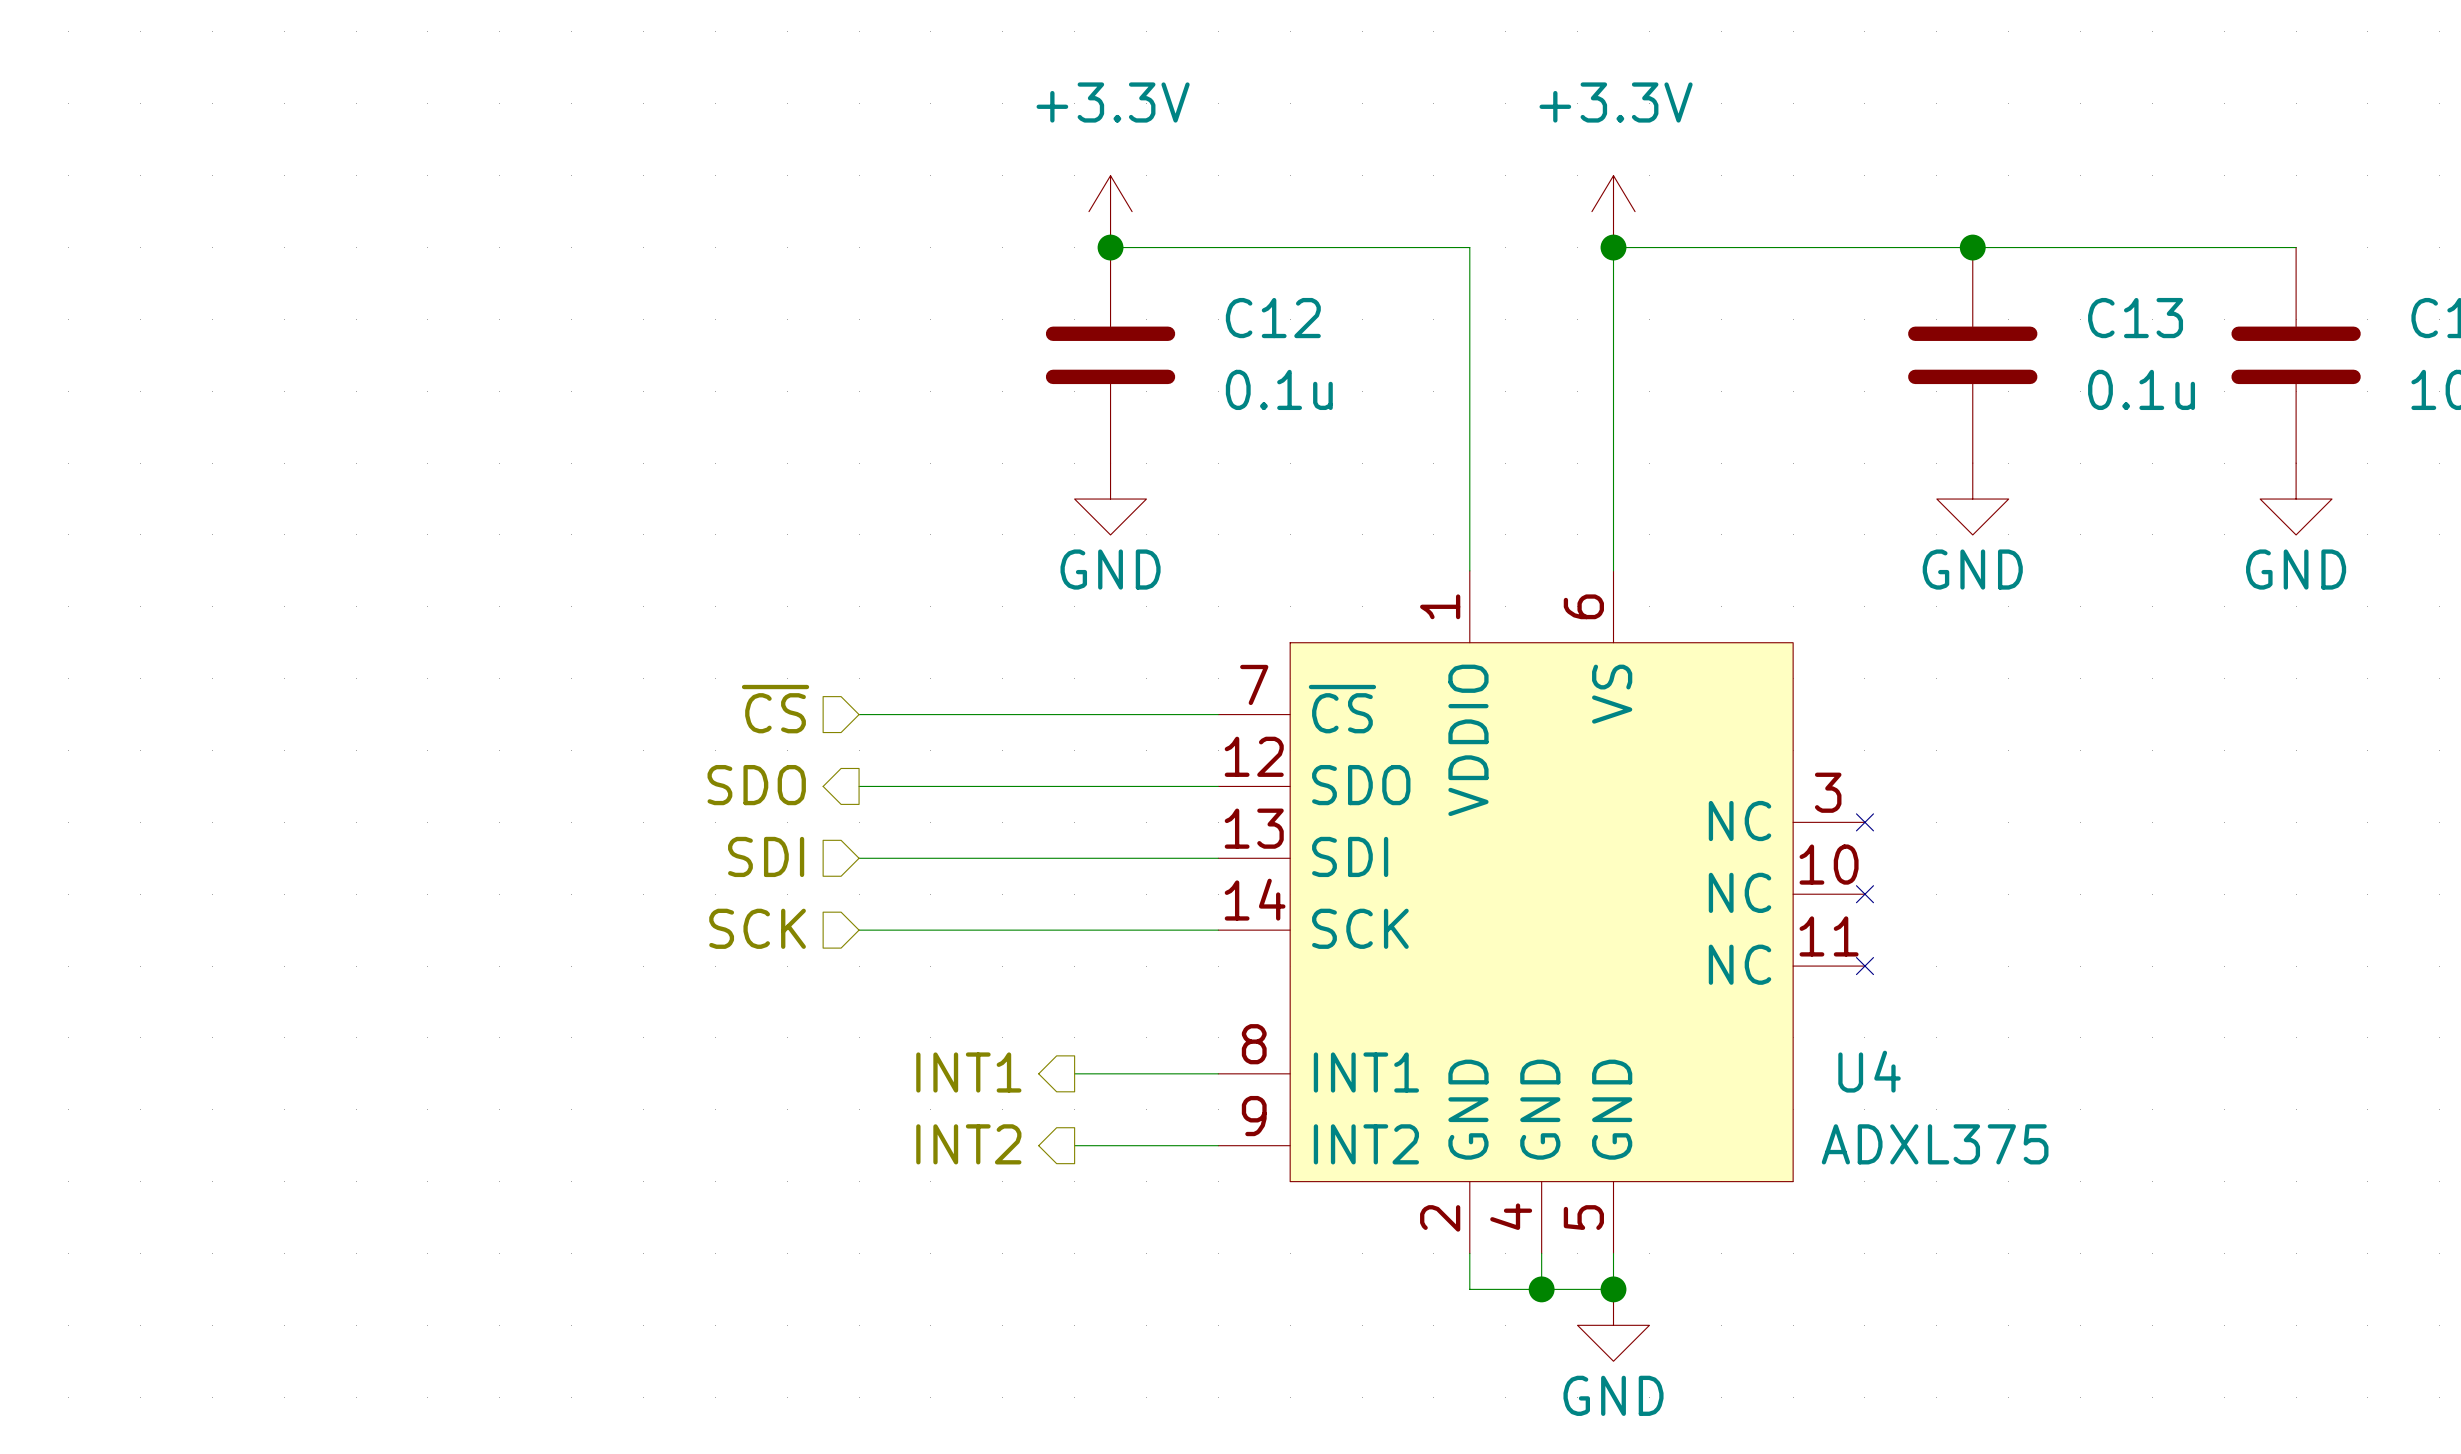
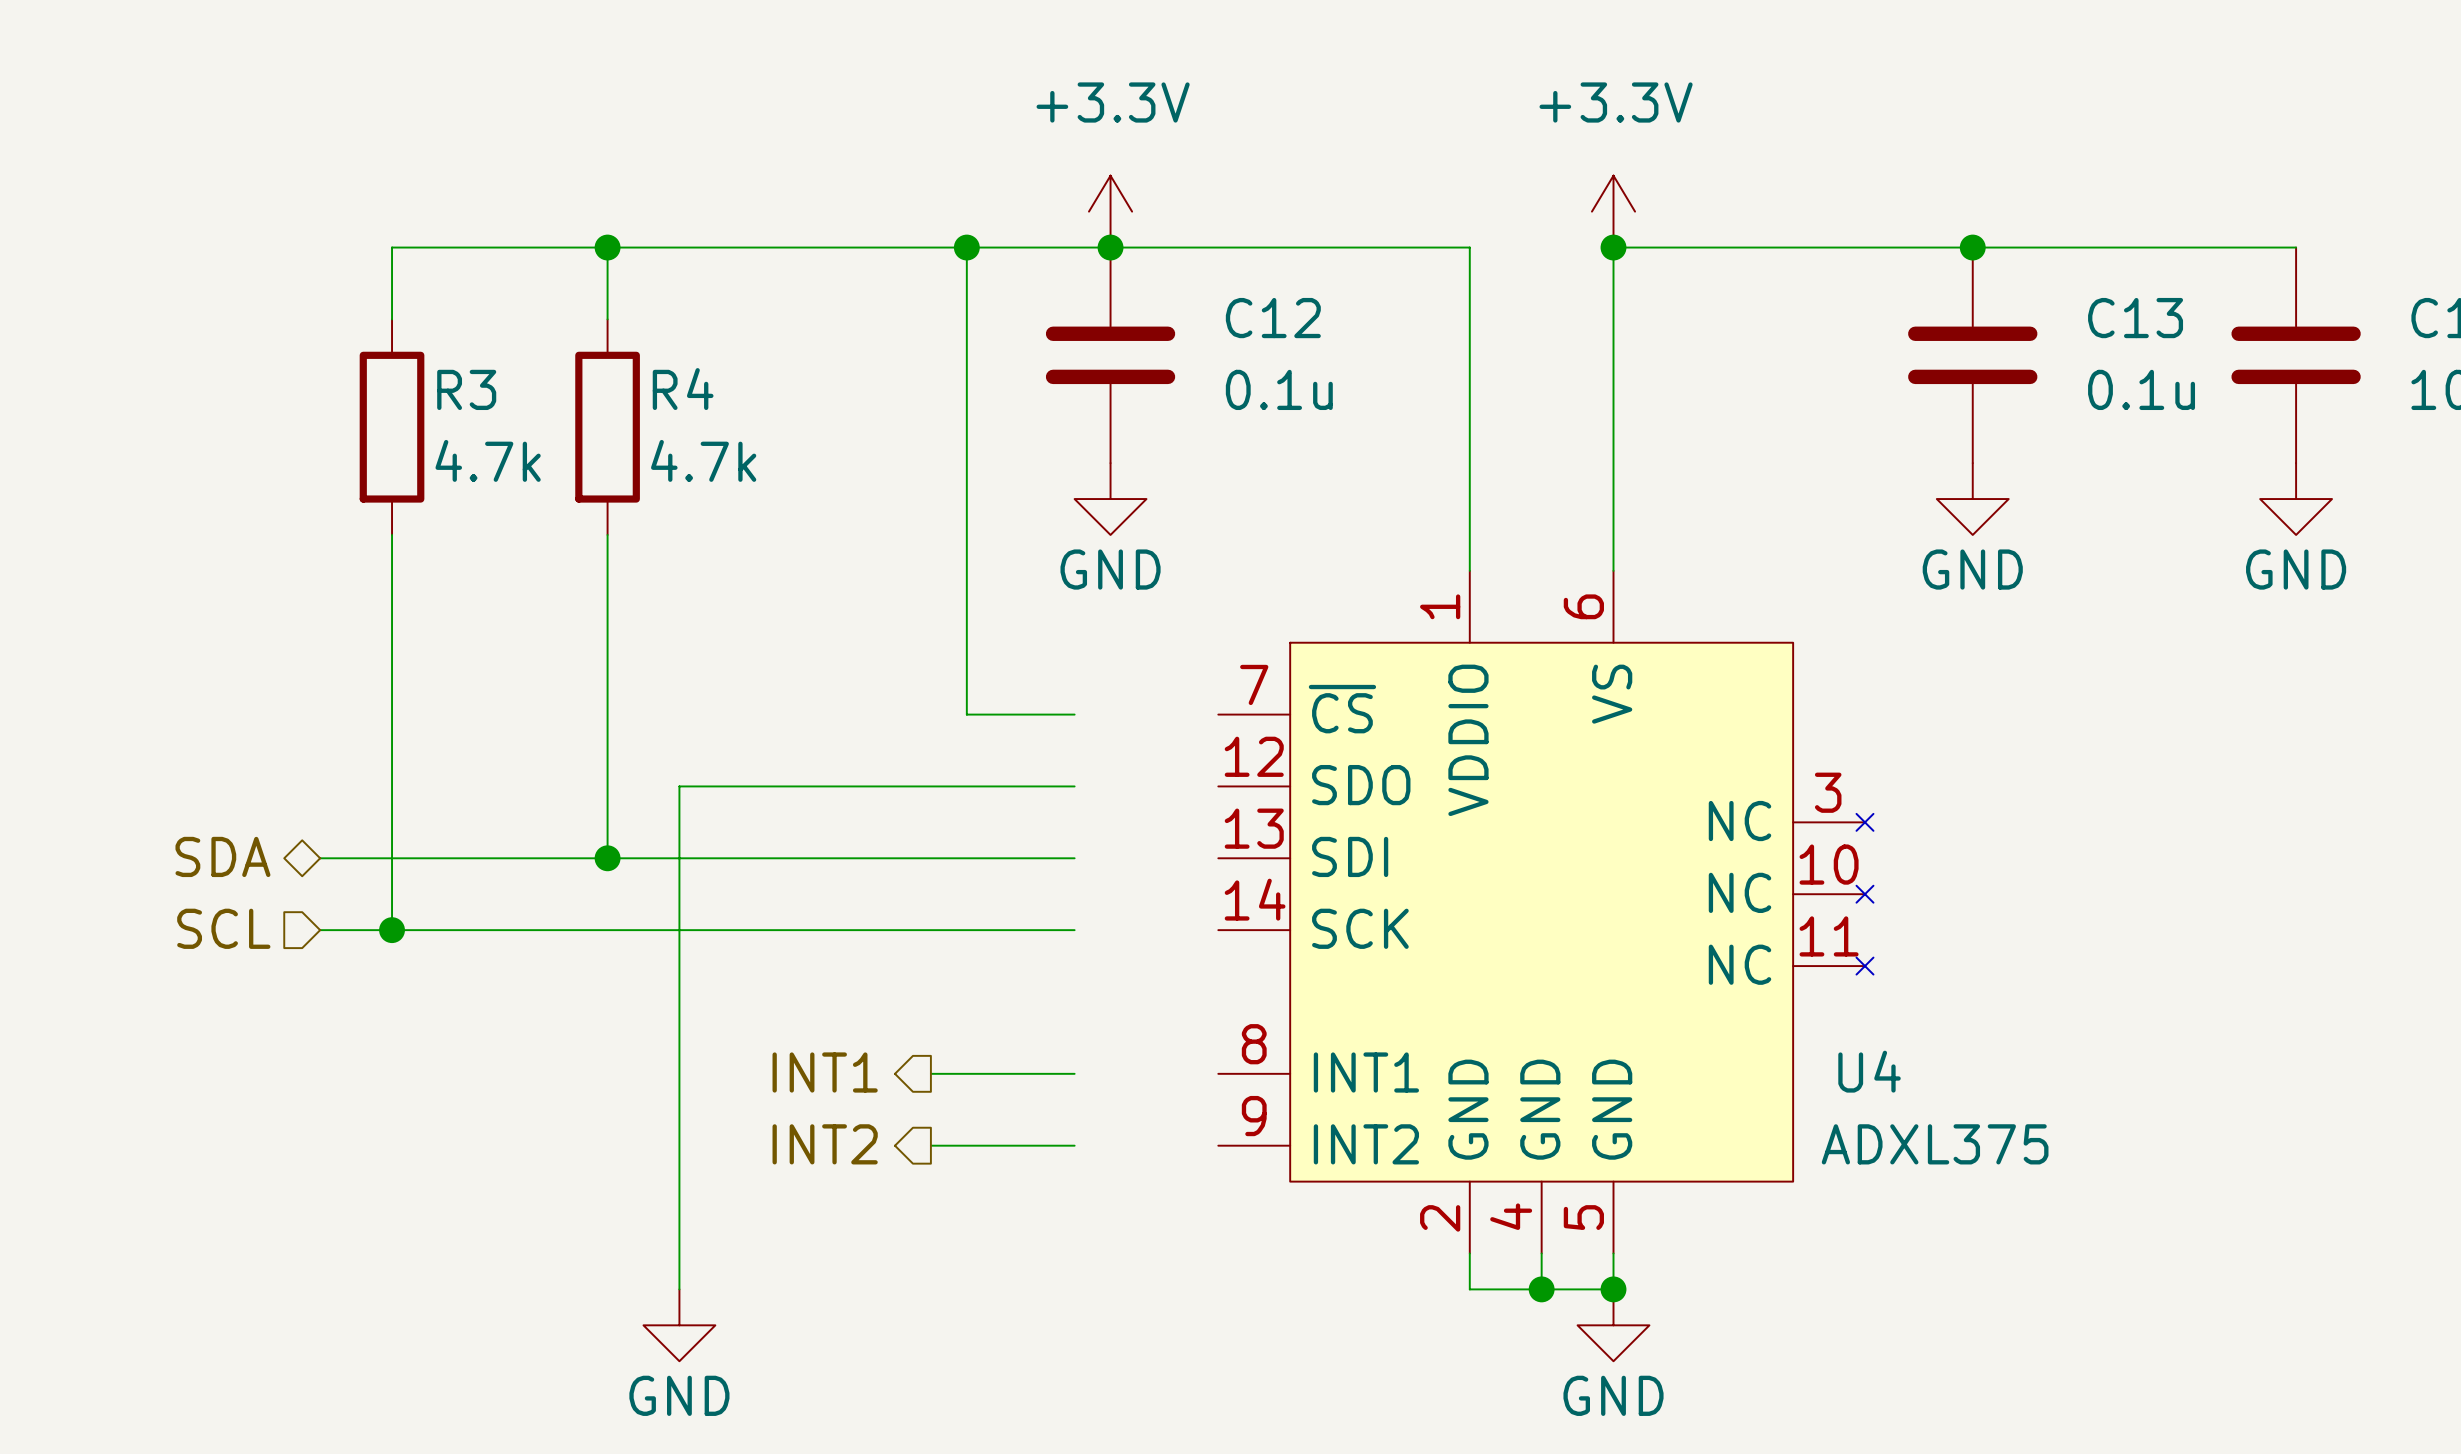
wire: none -> (607, 247) (607, 319)
junction: none -> (607, 247)
junction: none -> (966, 247)
wire: none -> (1110, 247) (392, 247) (392, 319)
R3: none -> 4.7k (392, 427)
R4: none -> 4.7k (607, 427)
wire: none -> (392, 534) (392, 930)
wire: none -> (607, 534) (607, 858)
hierarchical label: ~{CS} (775, 709) -> none
wire: (859, 714) (966, 714) -> (966, 247) (966, 714)
wire: (1074, 714) (1218, 714) -> none
hierarchical label: SDO (756, 785) -> none
wire: none -> (859, 786) (679, 786) (679, 1289)
wire: (1074, 786) (1218, 786) -> none
hierarchical label: none -> SDA (222, 856)
hierarchical label: SDI (766, 856) -> none
wire: none -> (320, 858) (859, 858)
junction: none -> (607, 858)
wire: (1074, 858) (1218, 858) -> none
hierarchical label: none -> SCL (223, 928)
hierarchical label: SCK (757, 928) -> none
wire: none -> (320, 930) (859, 930)
junction: none -> (392, 930)
wire: (1074, 930) (1218, 930) -> none
hierarchical label position: INT1 (968, 1072) -> INT1 (825, 1072)
wire: (1074, 1073) (1218, 1073) -> (1074, 1073) (930, 1073)
hierarchical label position: INT2 (968, 1144) -> INT2 (825, 1144)
wire: (1074, 1145) (1218, 1145) -> (1074, 1145) (930, 1145)
power symbol: none -> GND (679, 1325)

